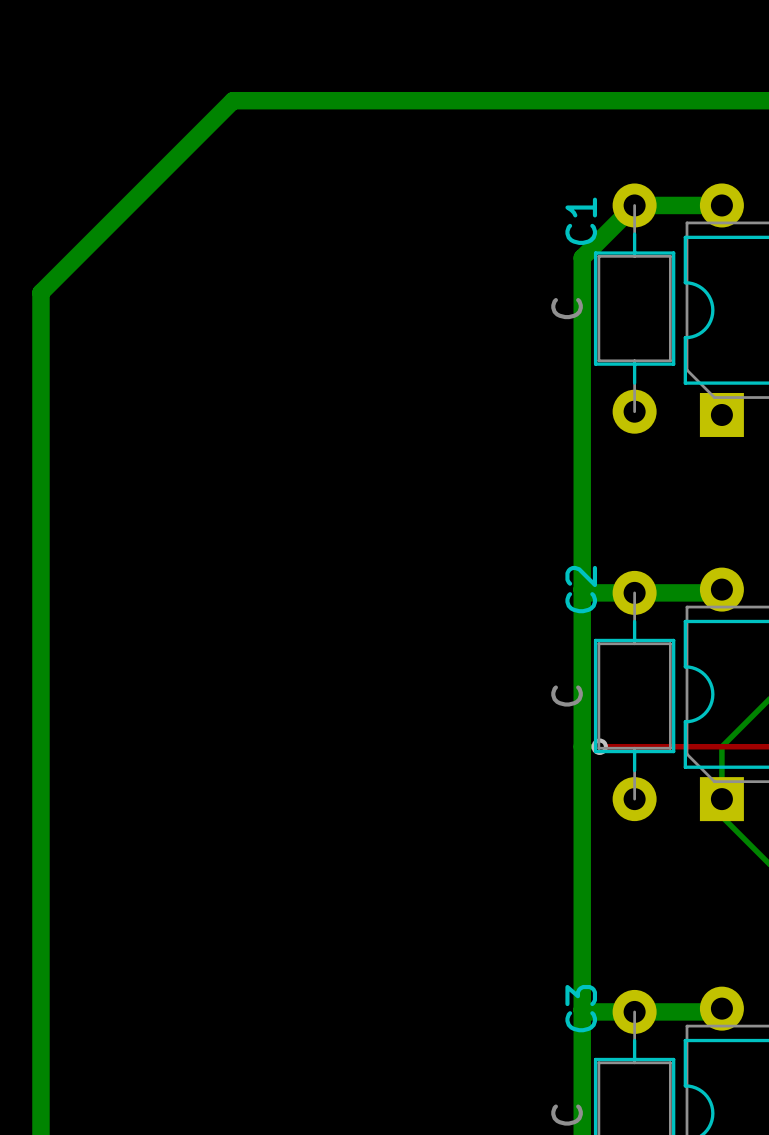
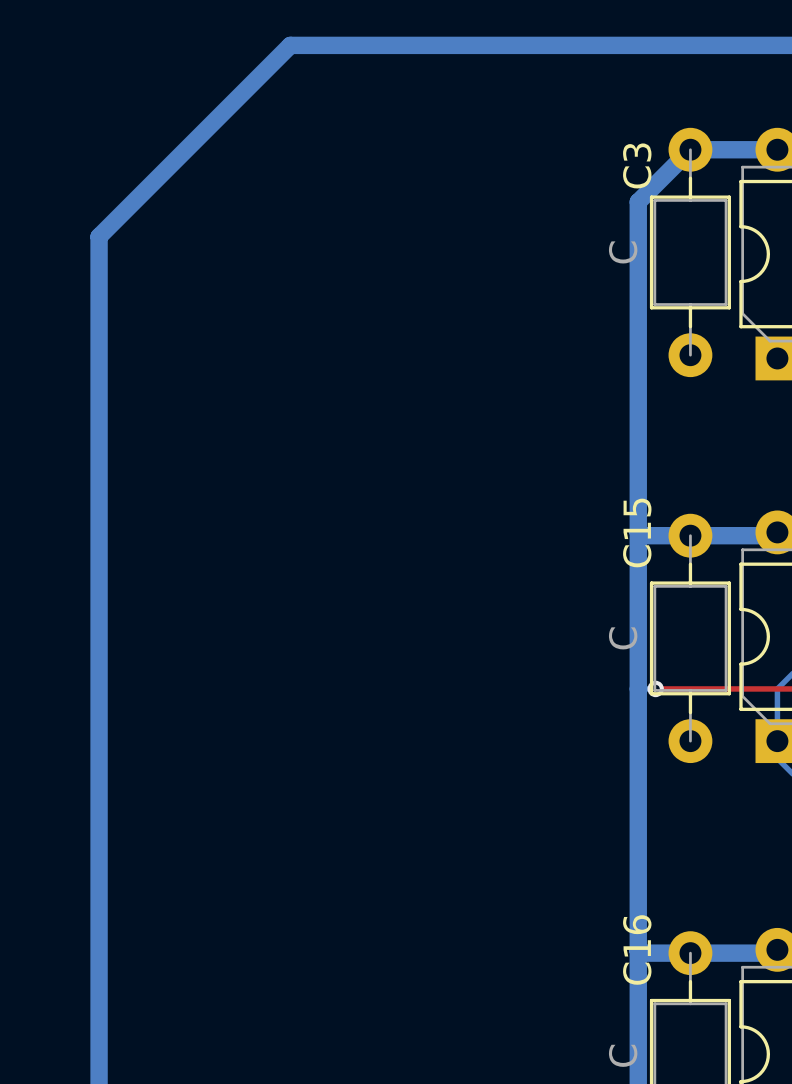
C1 name: C1 (581, 221) -> C3 (637, 165)
C2 name: C2 (581, 589) -> C15 (637, 532)
C3 name: C3 (581, 1008) -> C16 (637, 949)

